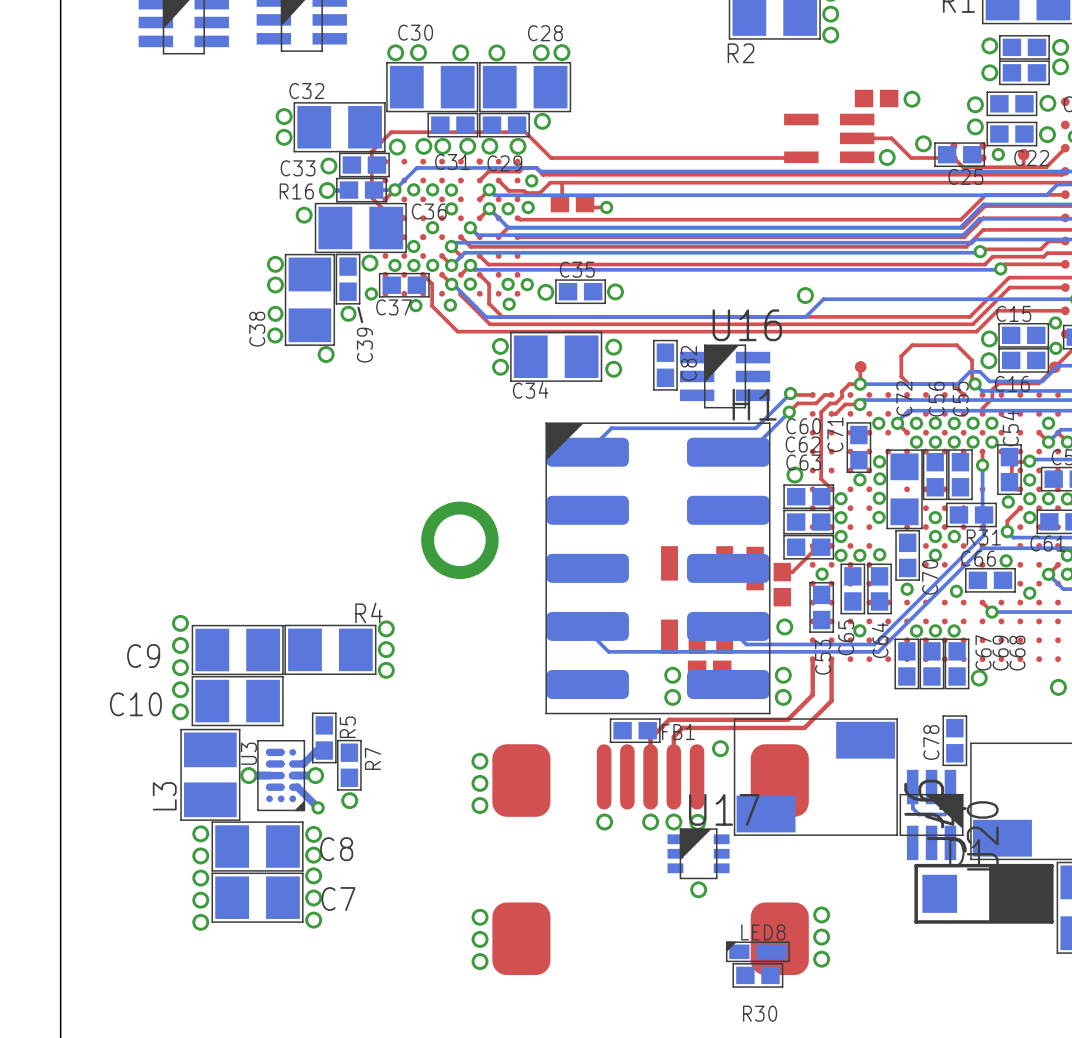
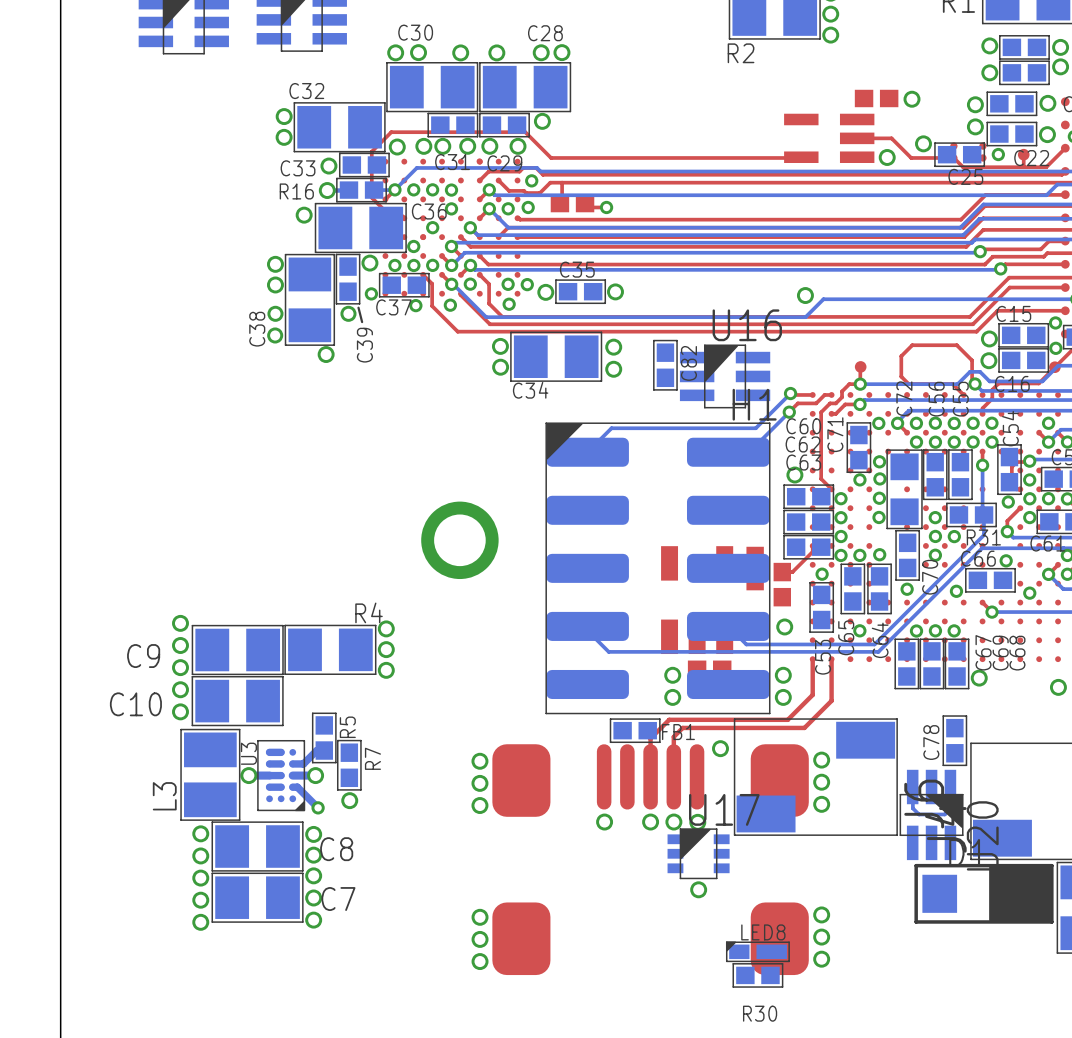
via: none -> (821, 760)
via: none -> (821, 782)
via: none -> (821, 804)

